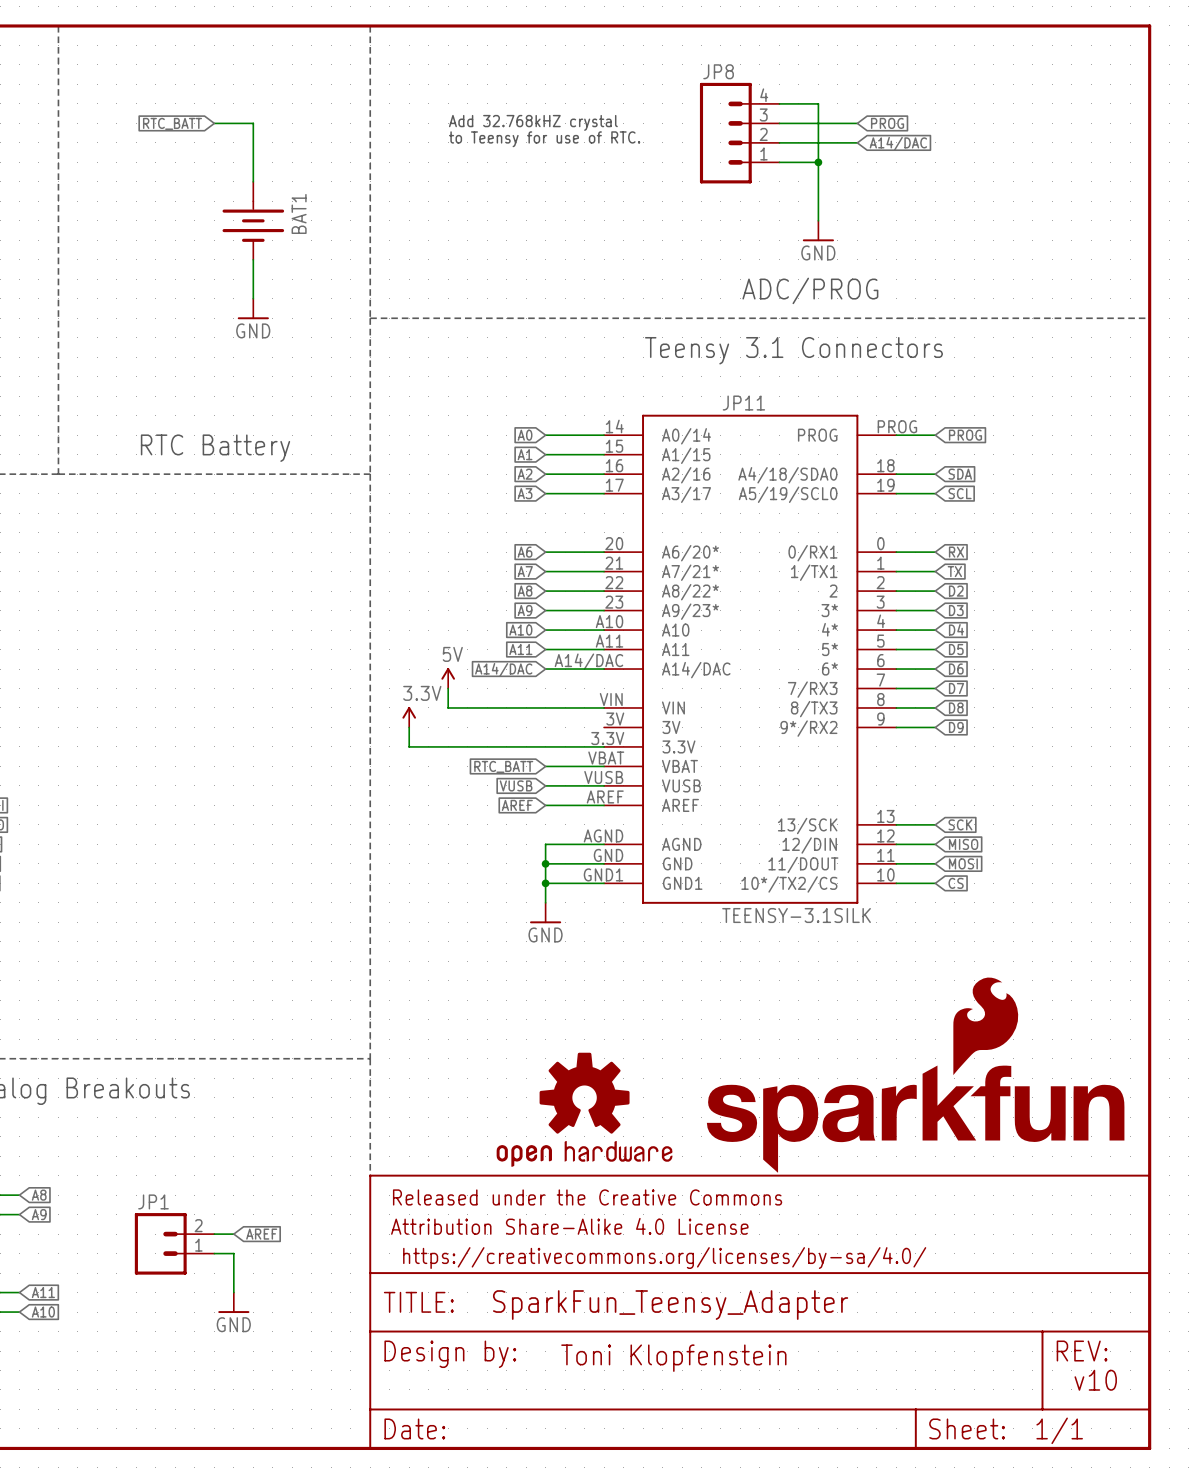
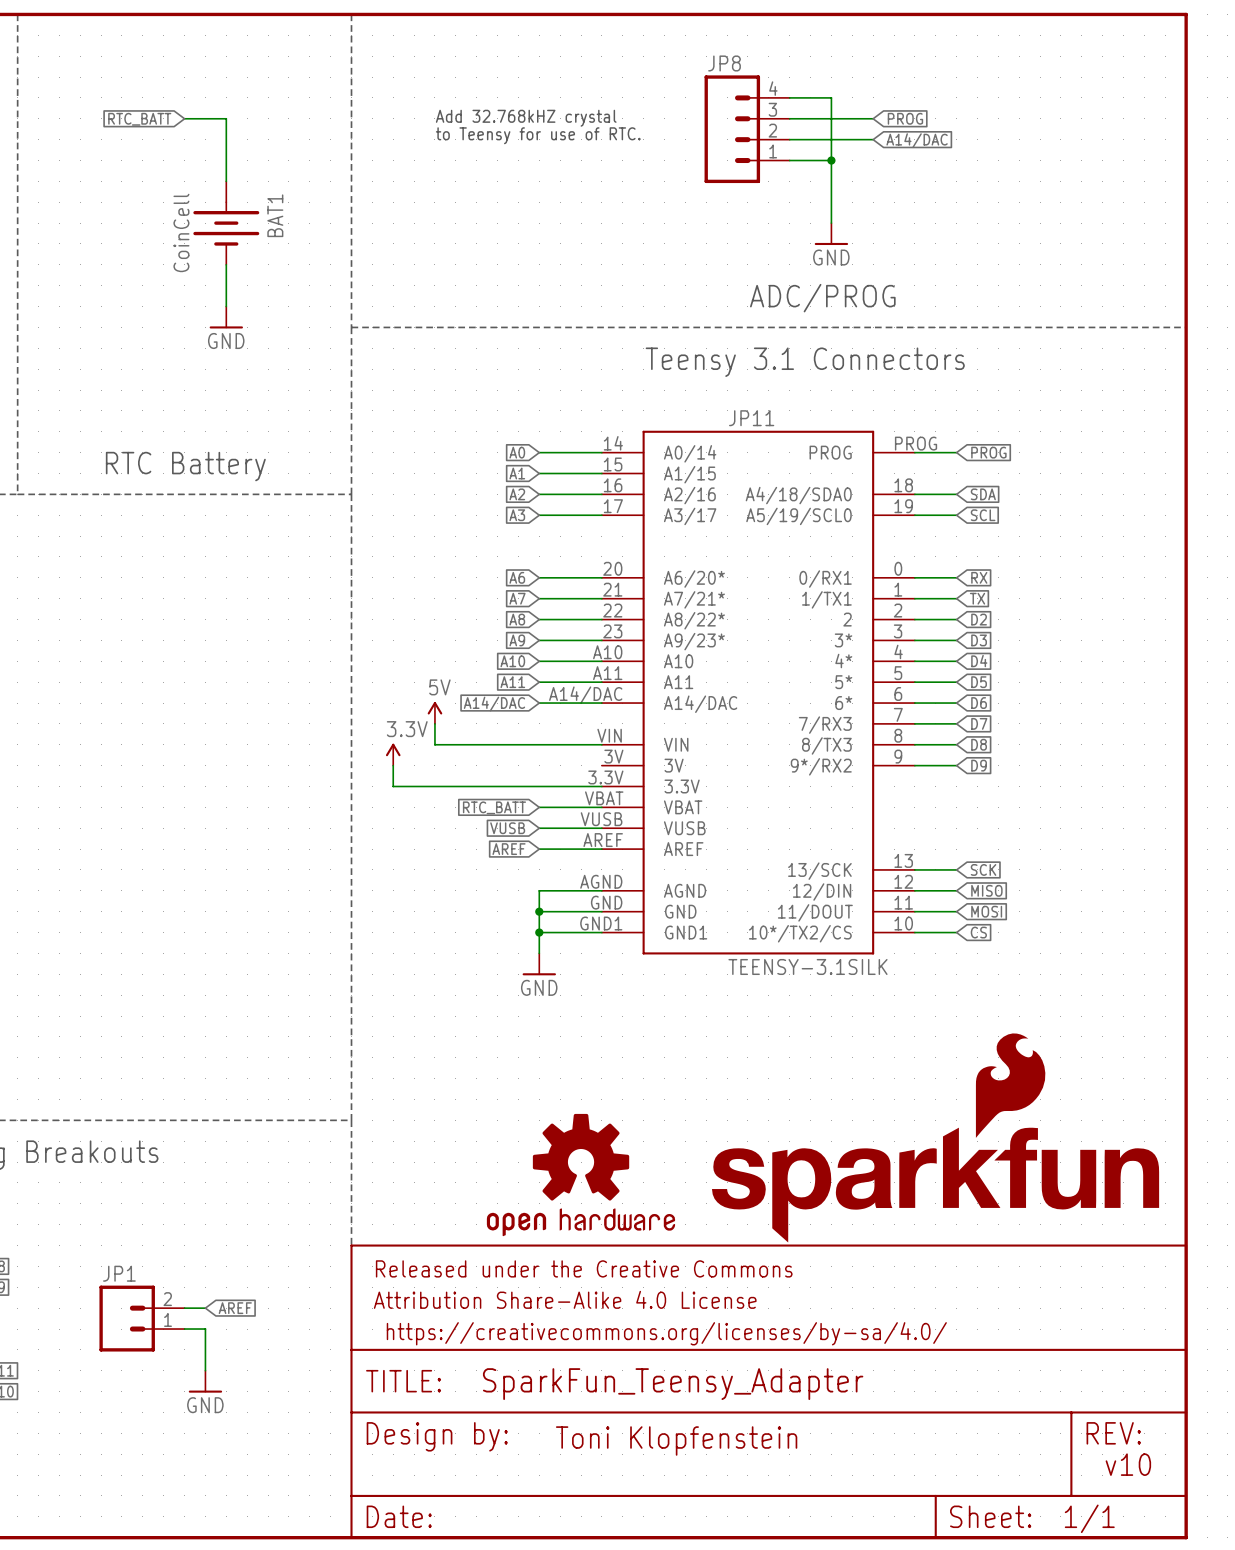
BAT1 value: none -> CoinCell (181, 232)

